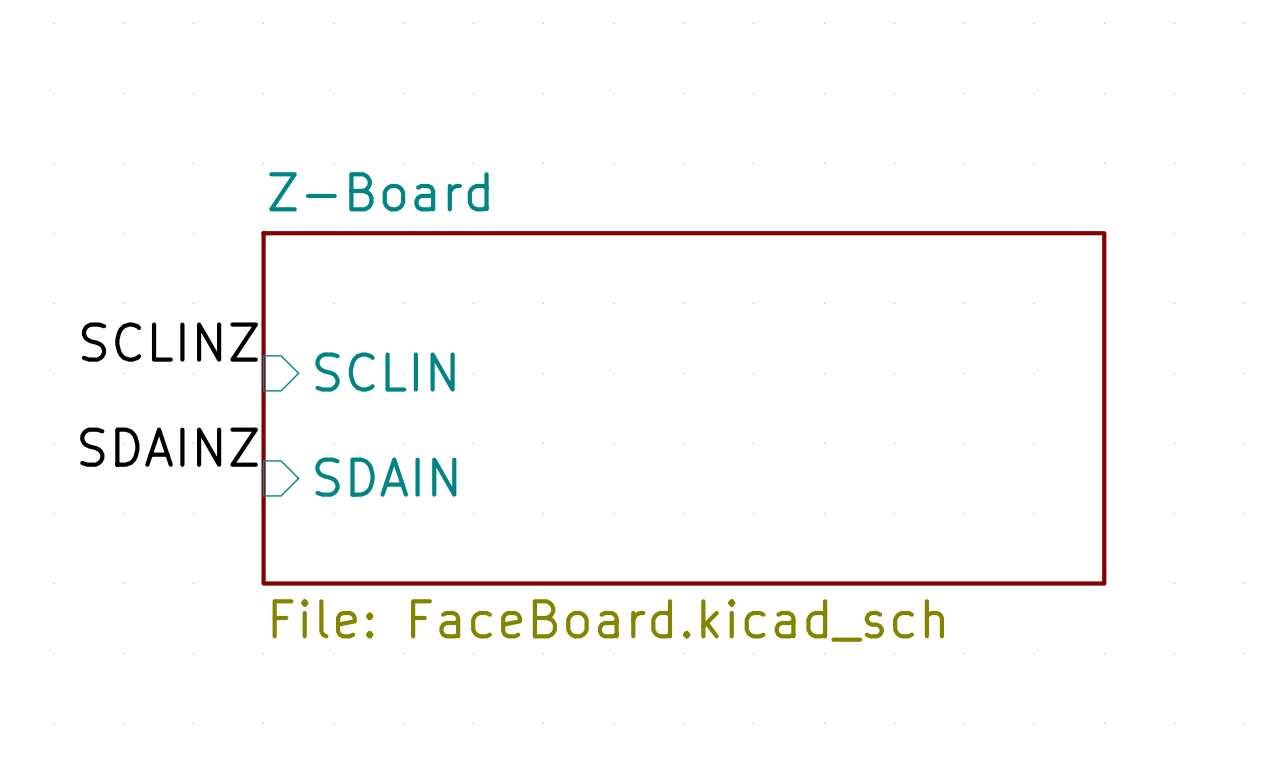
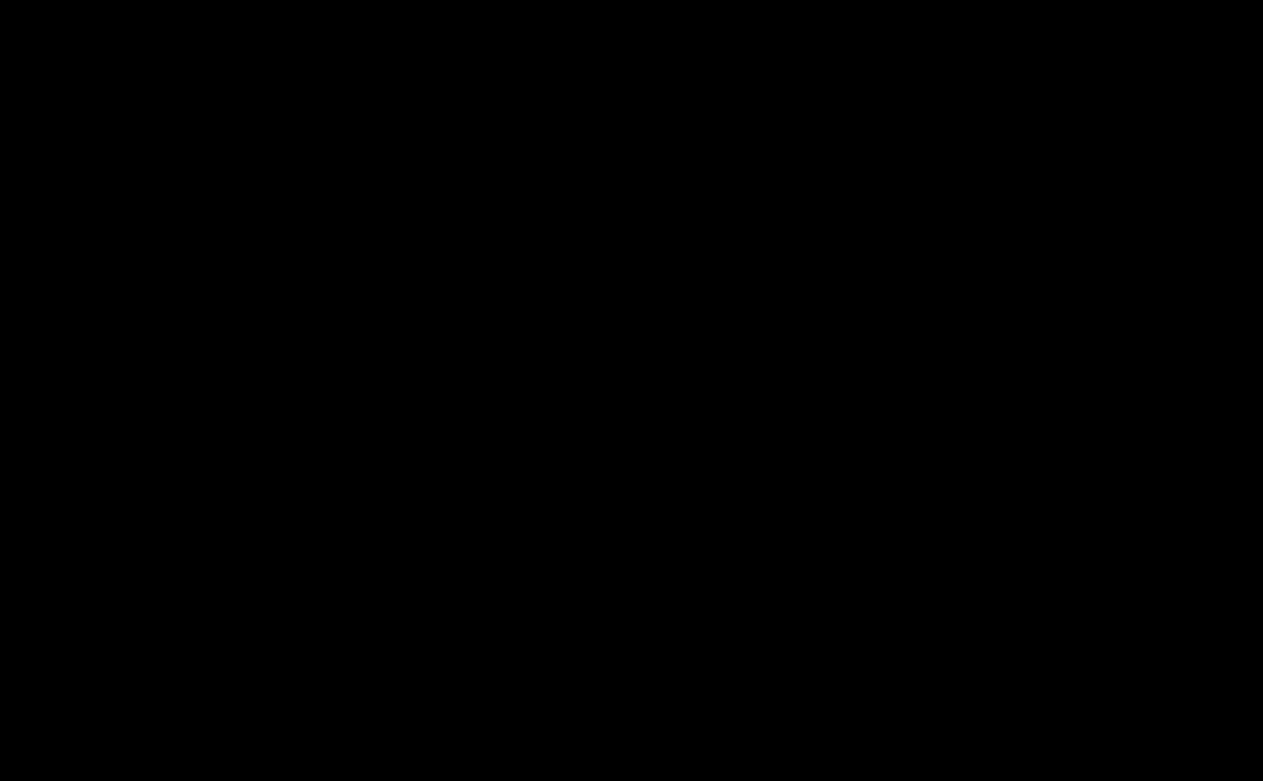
label: SCLINZ (169, 342) -> none
sheet pin: SCLIN (385, 372) -> none
sheet Z-Board: File: FaceBoard.kicad_sch (683, 408) -> none
label: SDAINZ (169, 447) -> none
sheet pin: SDAIN (385, 477) -> none

